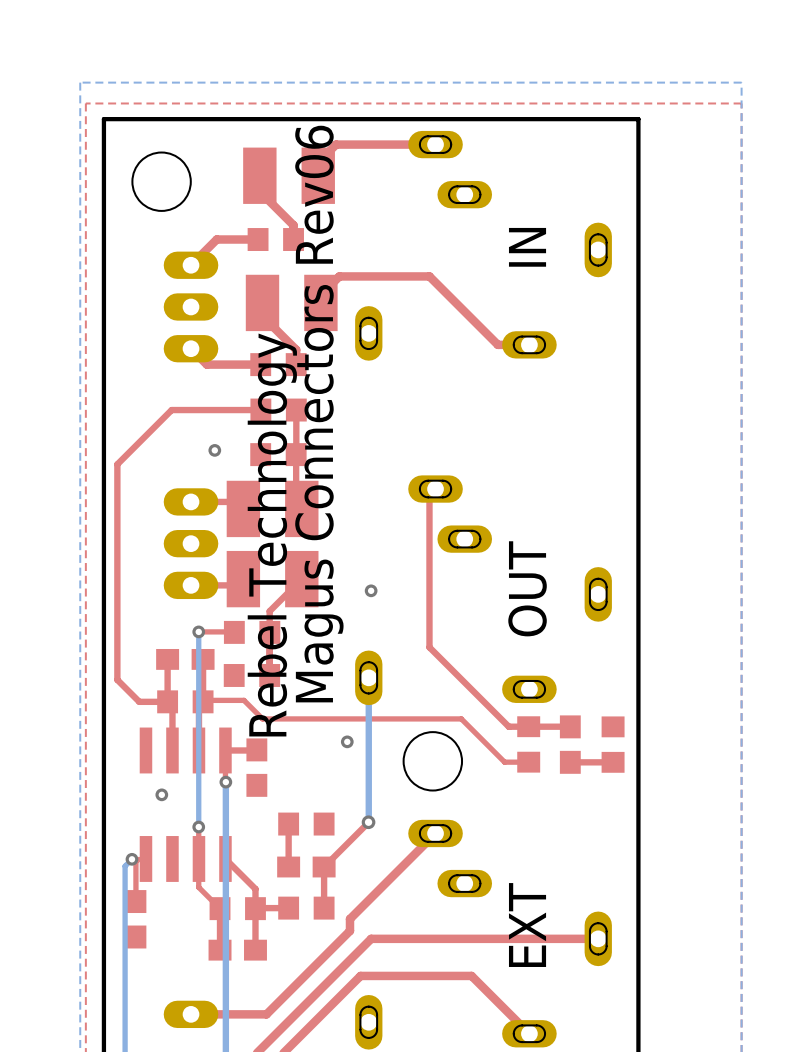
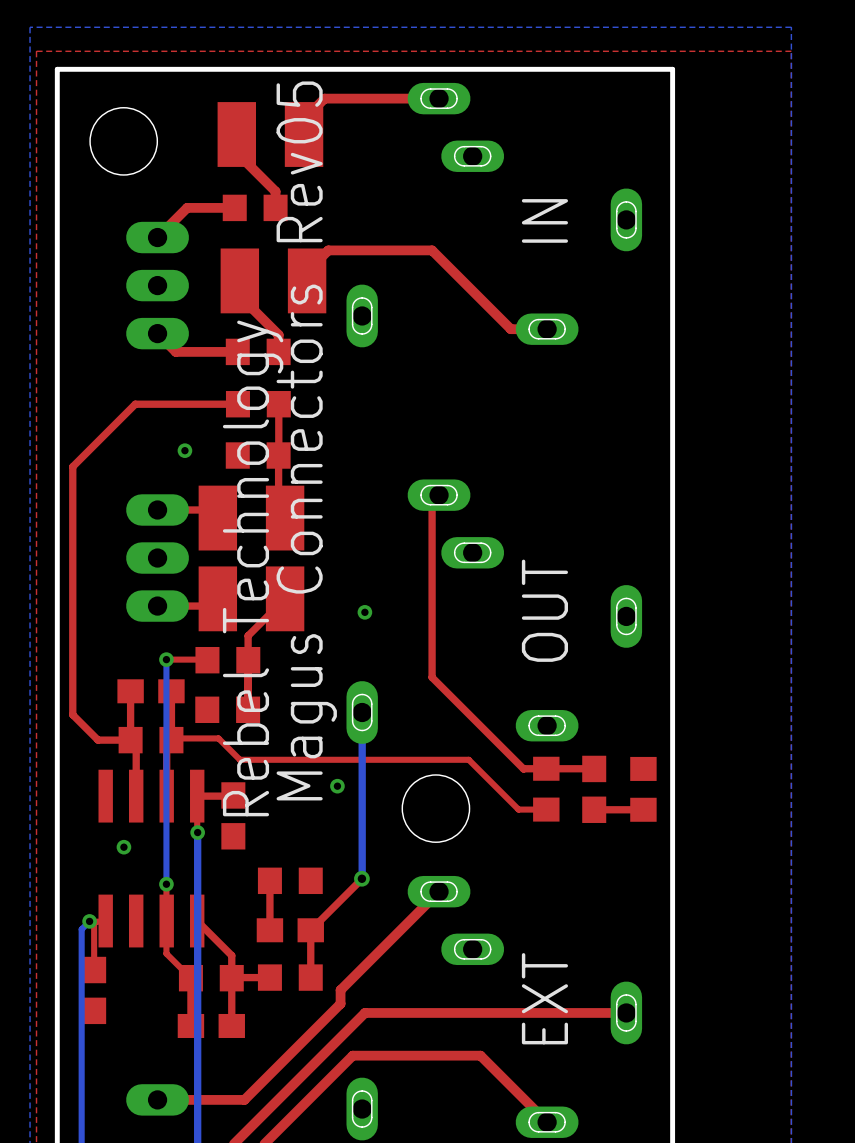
text: Magus Connectors Rev06 (319, 414) -> Magus Connectors Rev05 (306, 440)

